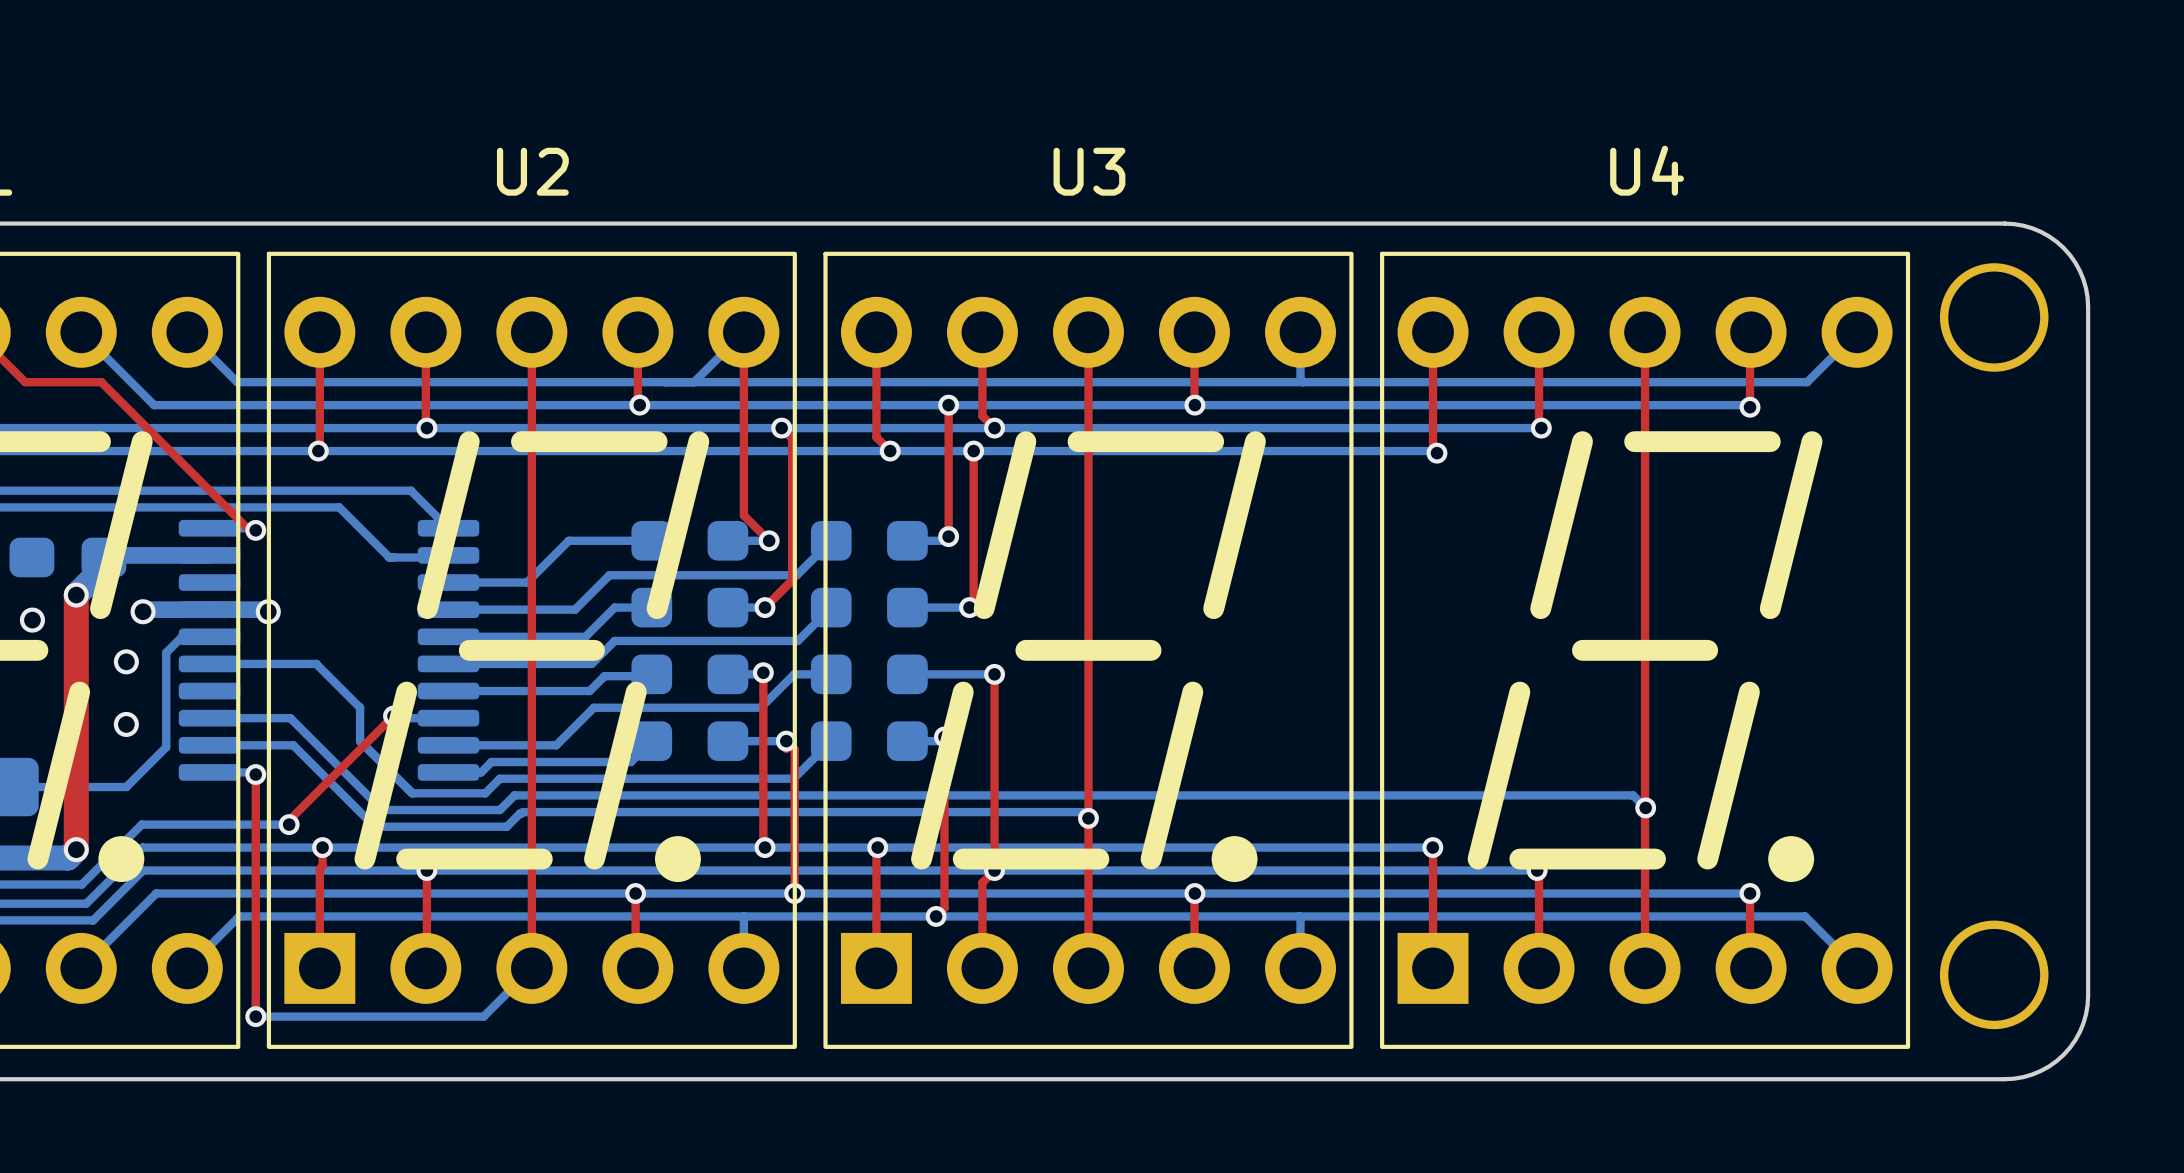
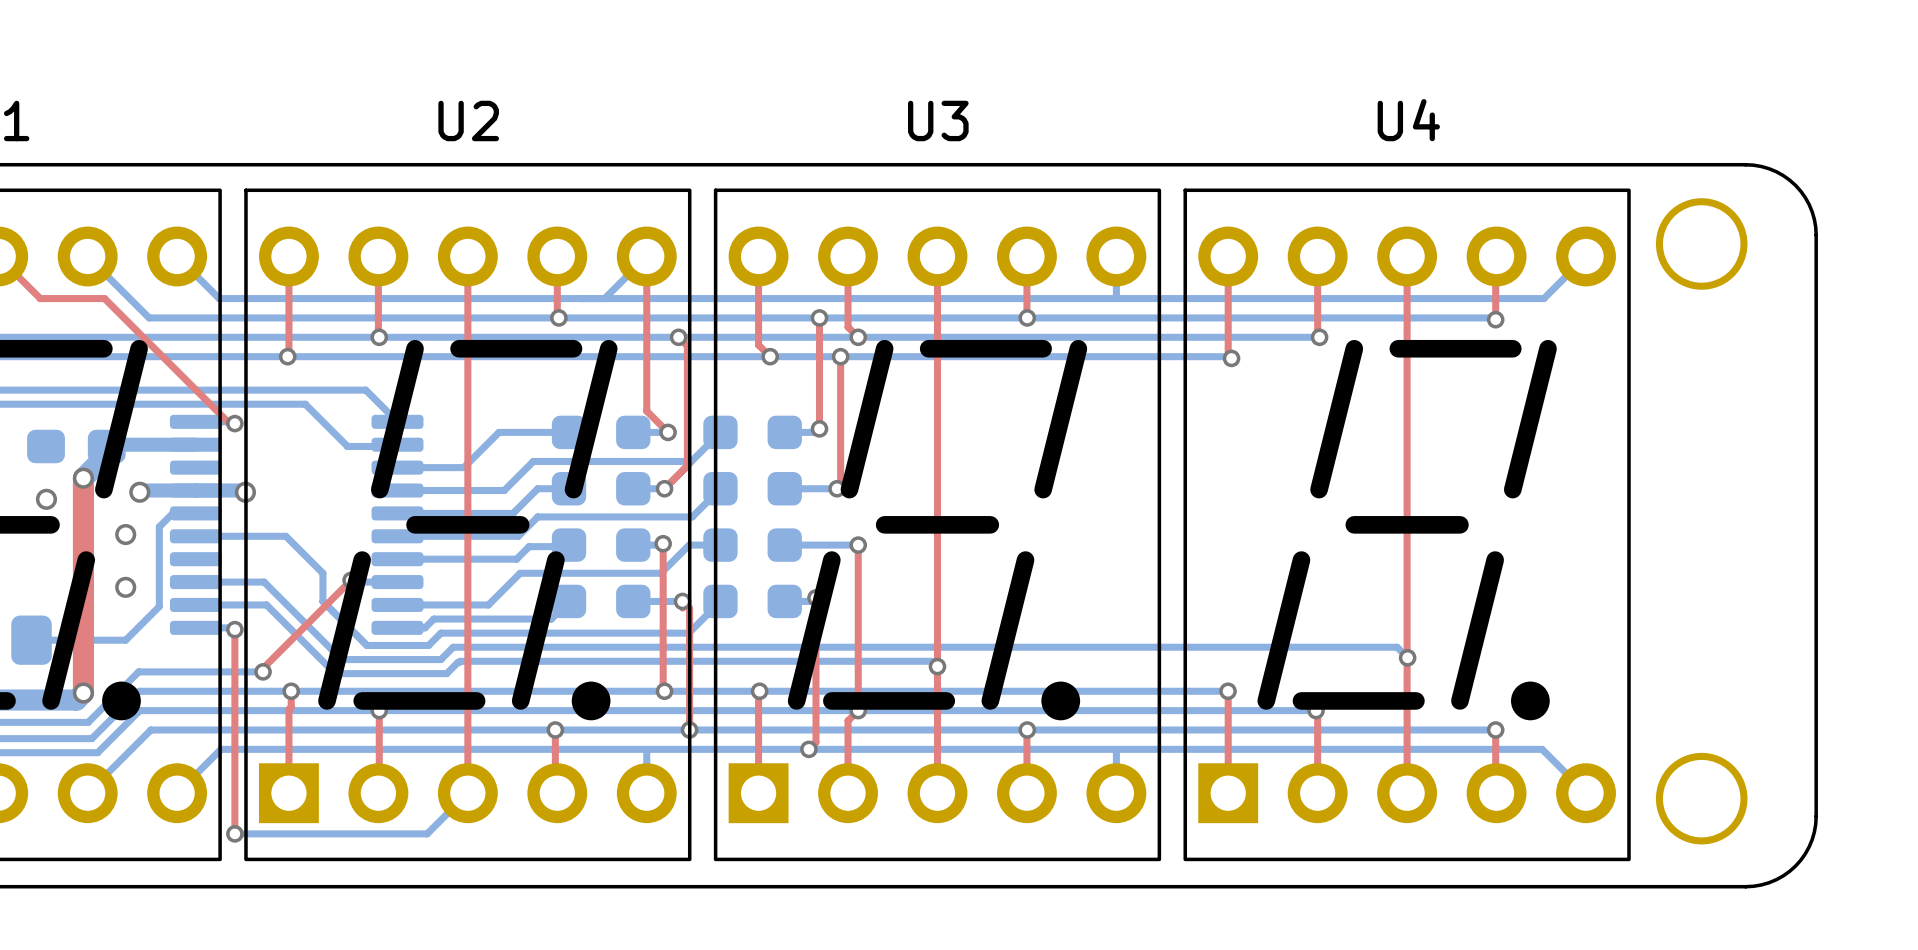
board edge: (2004, 223) (2023, 225) (2040, 231) (2063, 248) (2079, 270) (2086, 288) (2088, 307) (2087, 1005) (2079, 1031) (2069, 1047) (2056, 1061) (2032, 1074) (2004, 1079) -> (1710, 164) (1753, 165) (1769, 168) (1783, 175) (1795, 185) (1809, 204) (1814, 219) (1816, 235) (1815, 824) (1812, 839) (1805, 853) (1795, 866) (1783, 875) (1769, 882) (1753, 886) (1710, 886)

